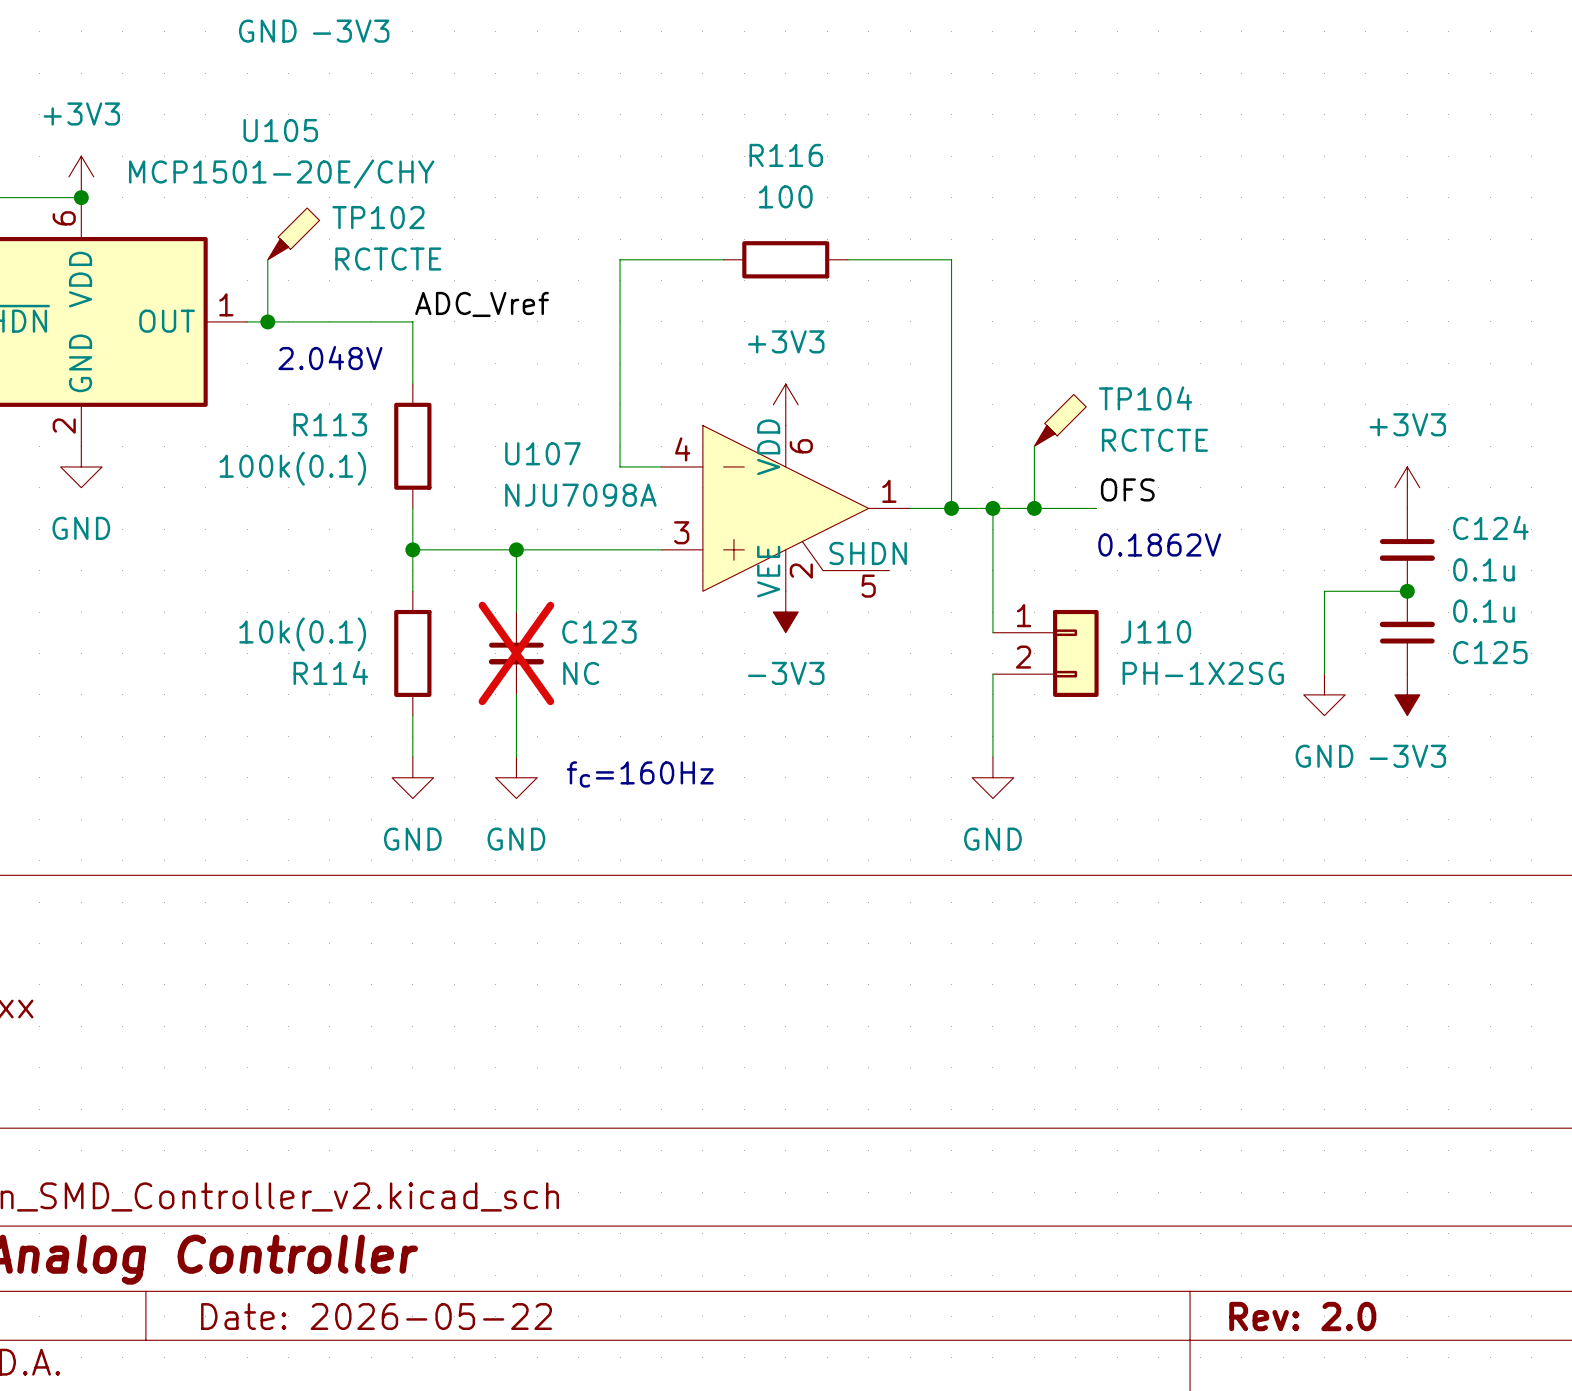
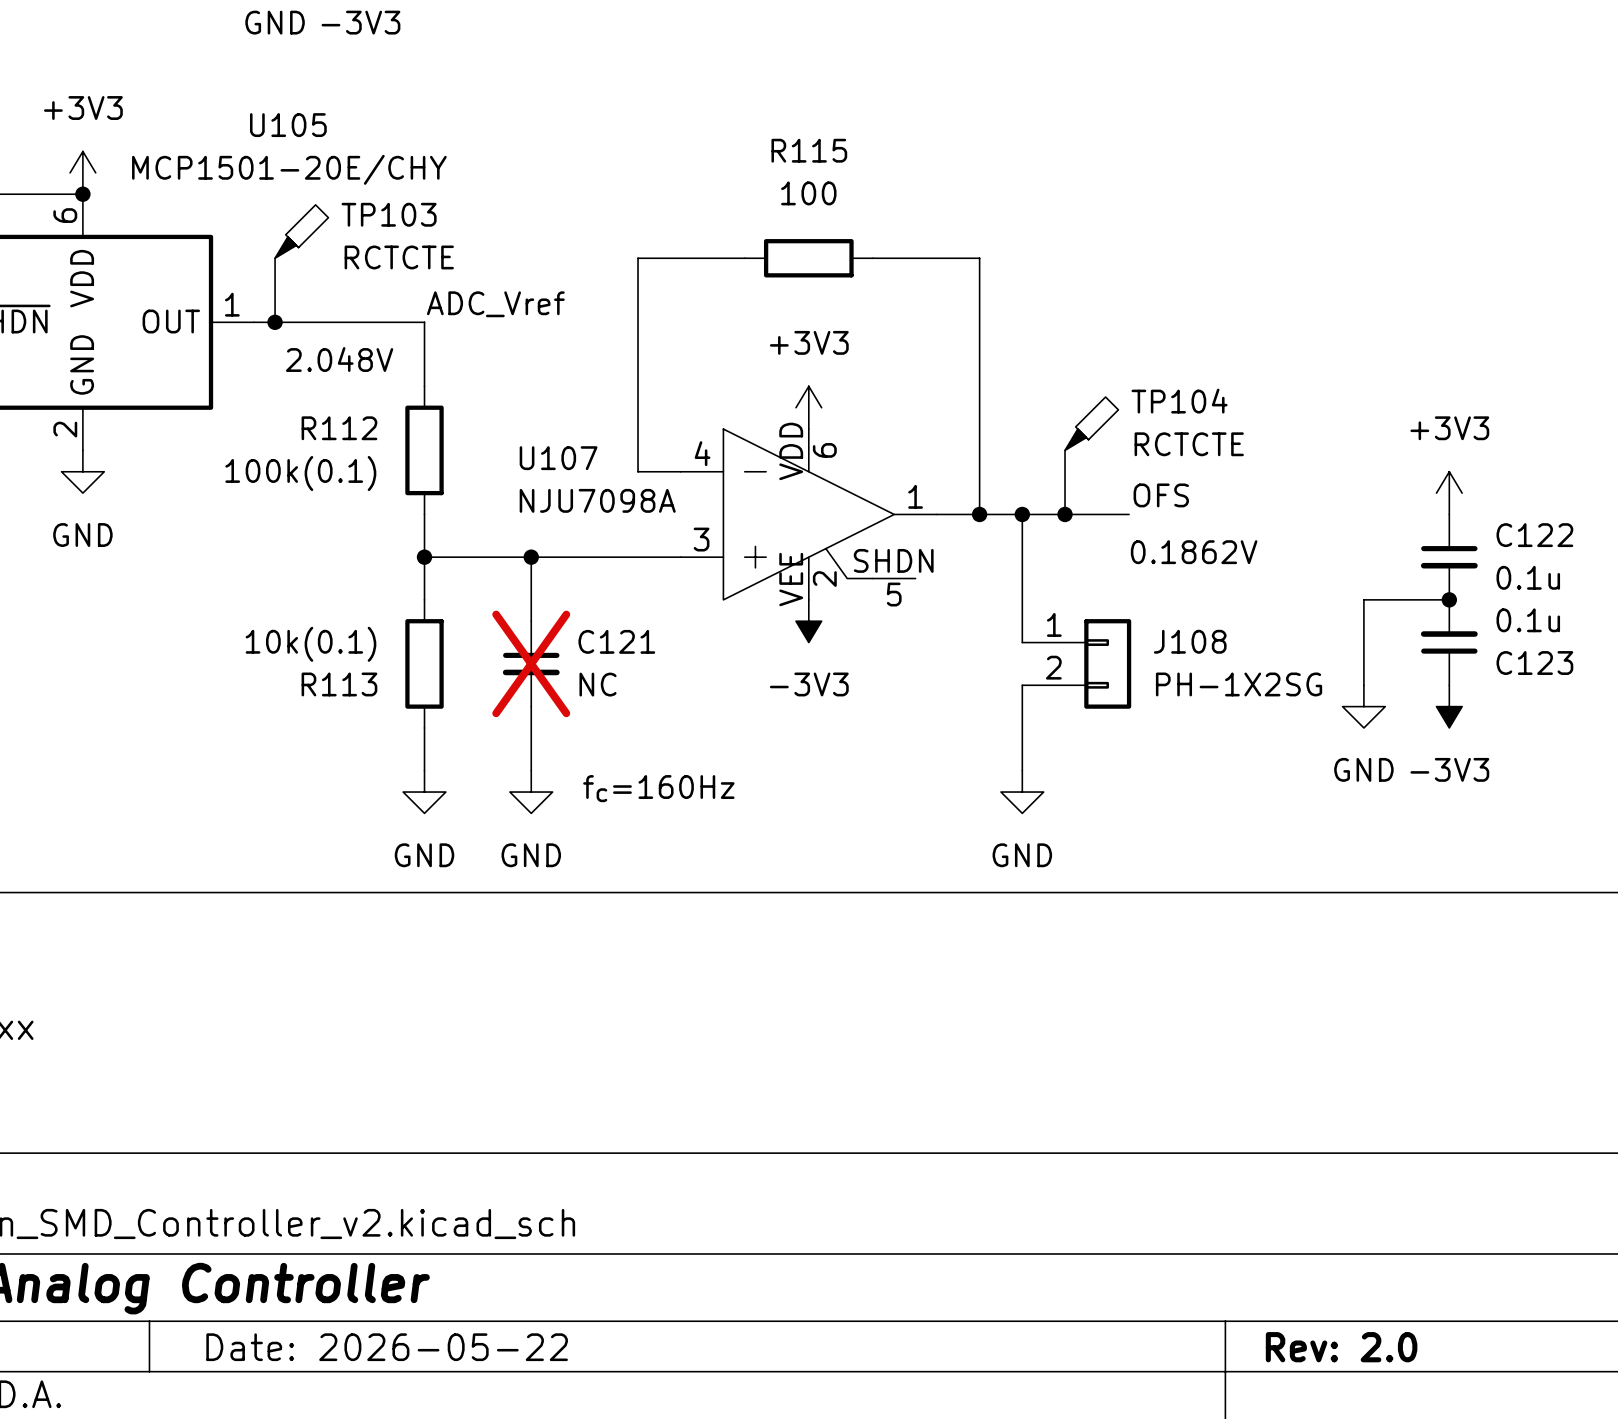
R116 name: R116 (786, 155) -> R115 (809, 150)
TP102 name: TP102 (378, 217) -> TP103 (389, 214)
R113 name: R113 (330, 424) -> R112 (339, 428)
C124 name: C124 (1490, 527) -> C122 (1534, 535)
J110 name: J110 (1155, 631) -> J108 (1190, 641)
C123 name: C123 (599, 632) -> C121 (616, 641)
C125 name: C125 (1490, 652) -> C123 (1534, 663)
R114 name: R114 (330, 672) -> R113 (339, 684)

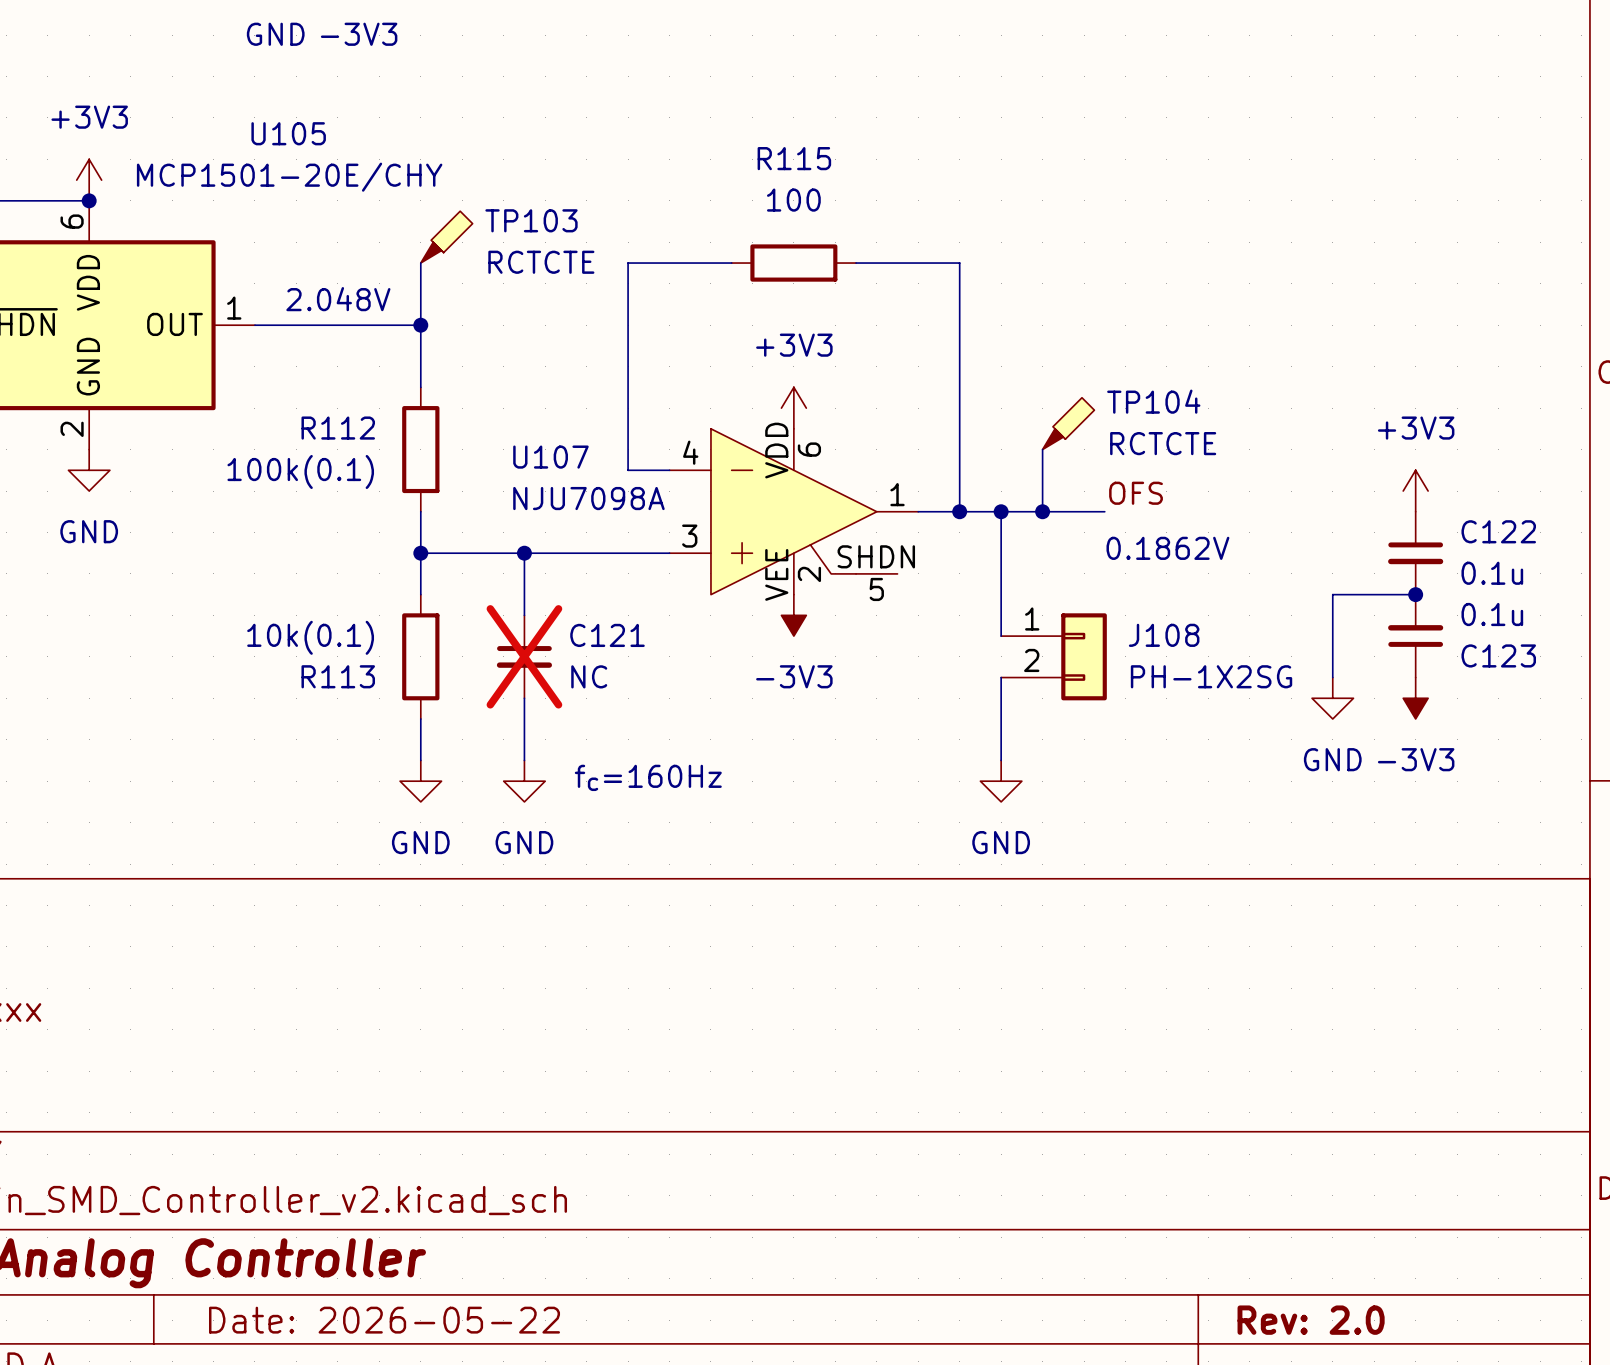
TP103 position: (301, 231) -> (446, 237)
wire: (275, 258) (275, 322) -> (420, 263) (420, 325)
label: ADC_Vref (495, 304) -> none
junction: (275, 322) -> none
junction: none -> (420, 325)
text position: 2.048V (339, 359) -> 2.048V (338, 299)

